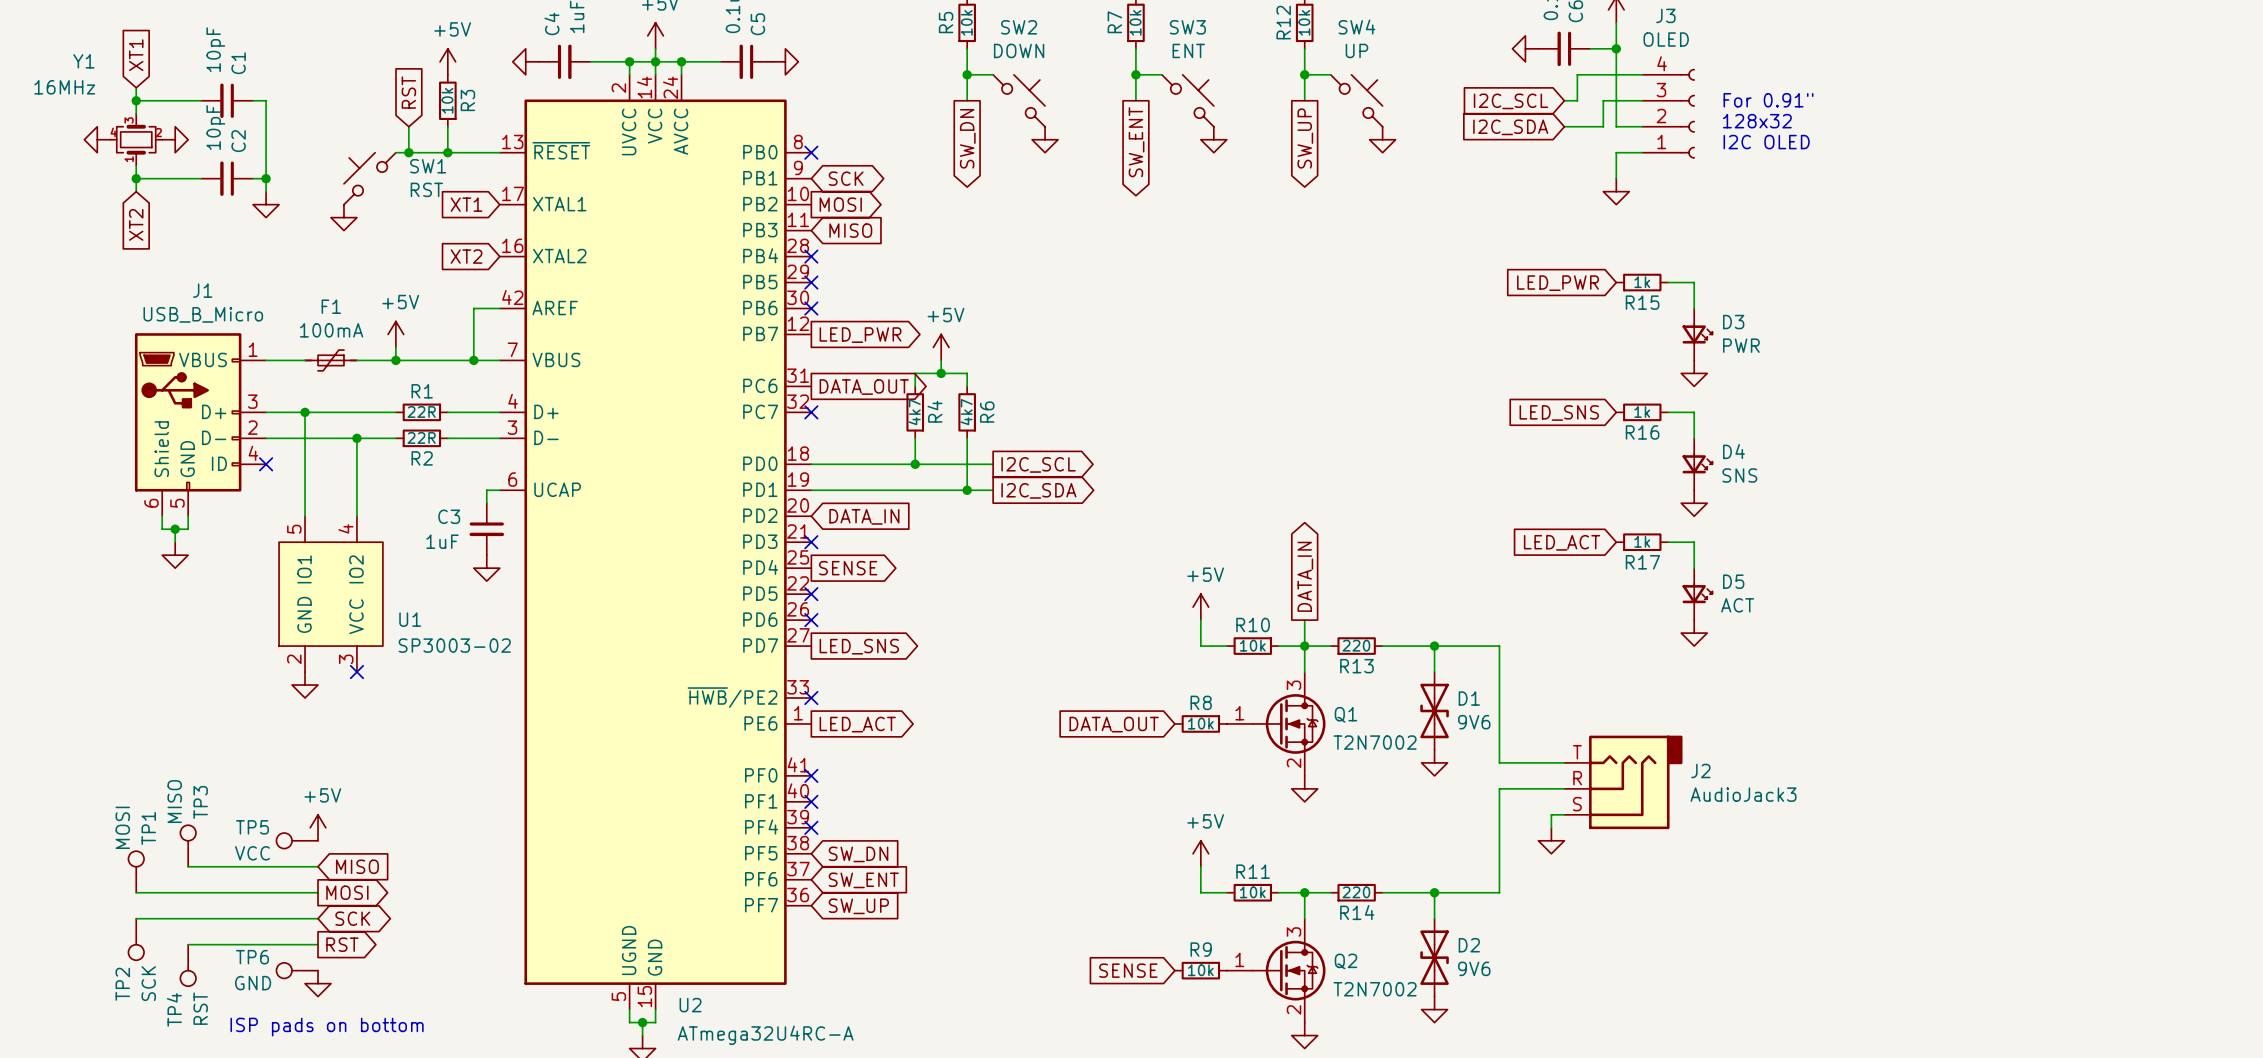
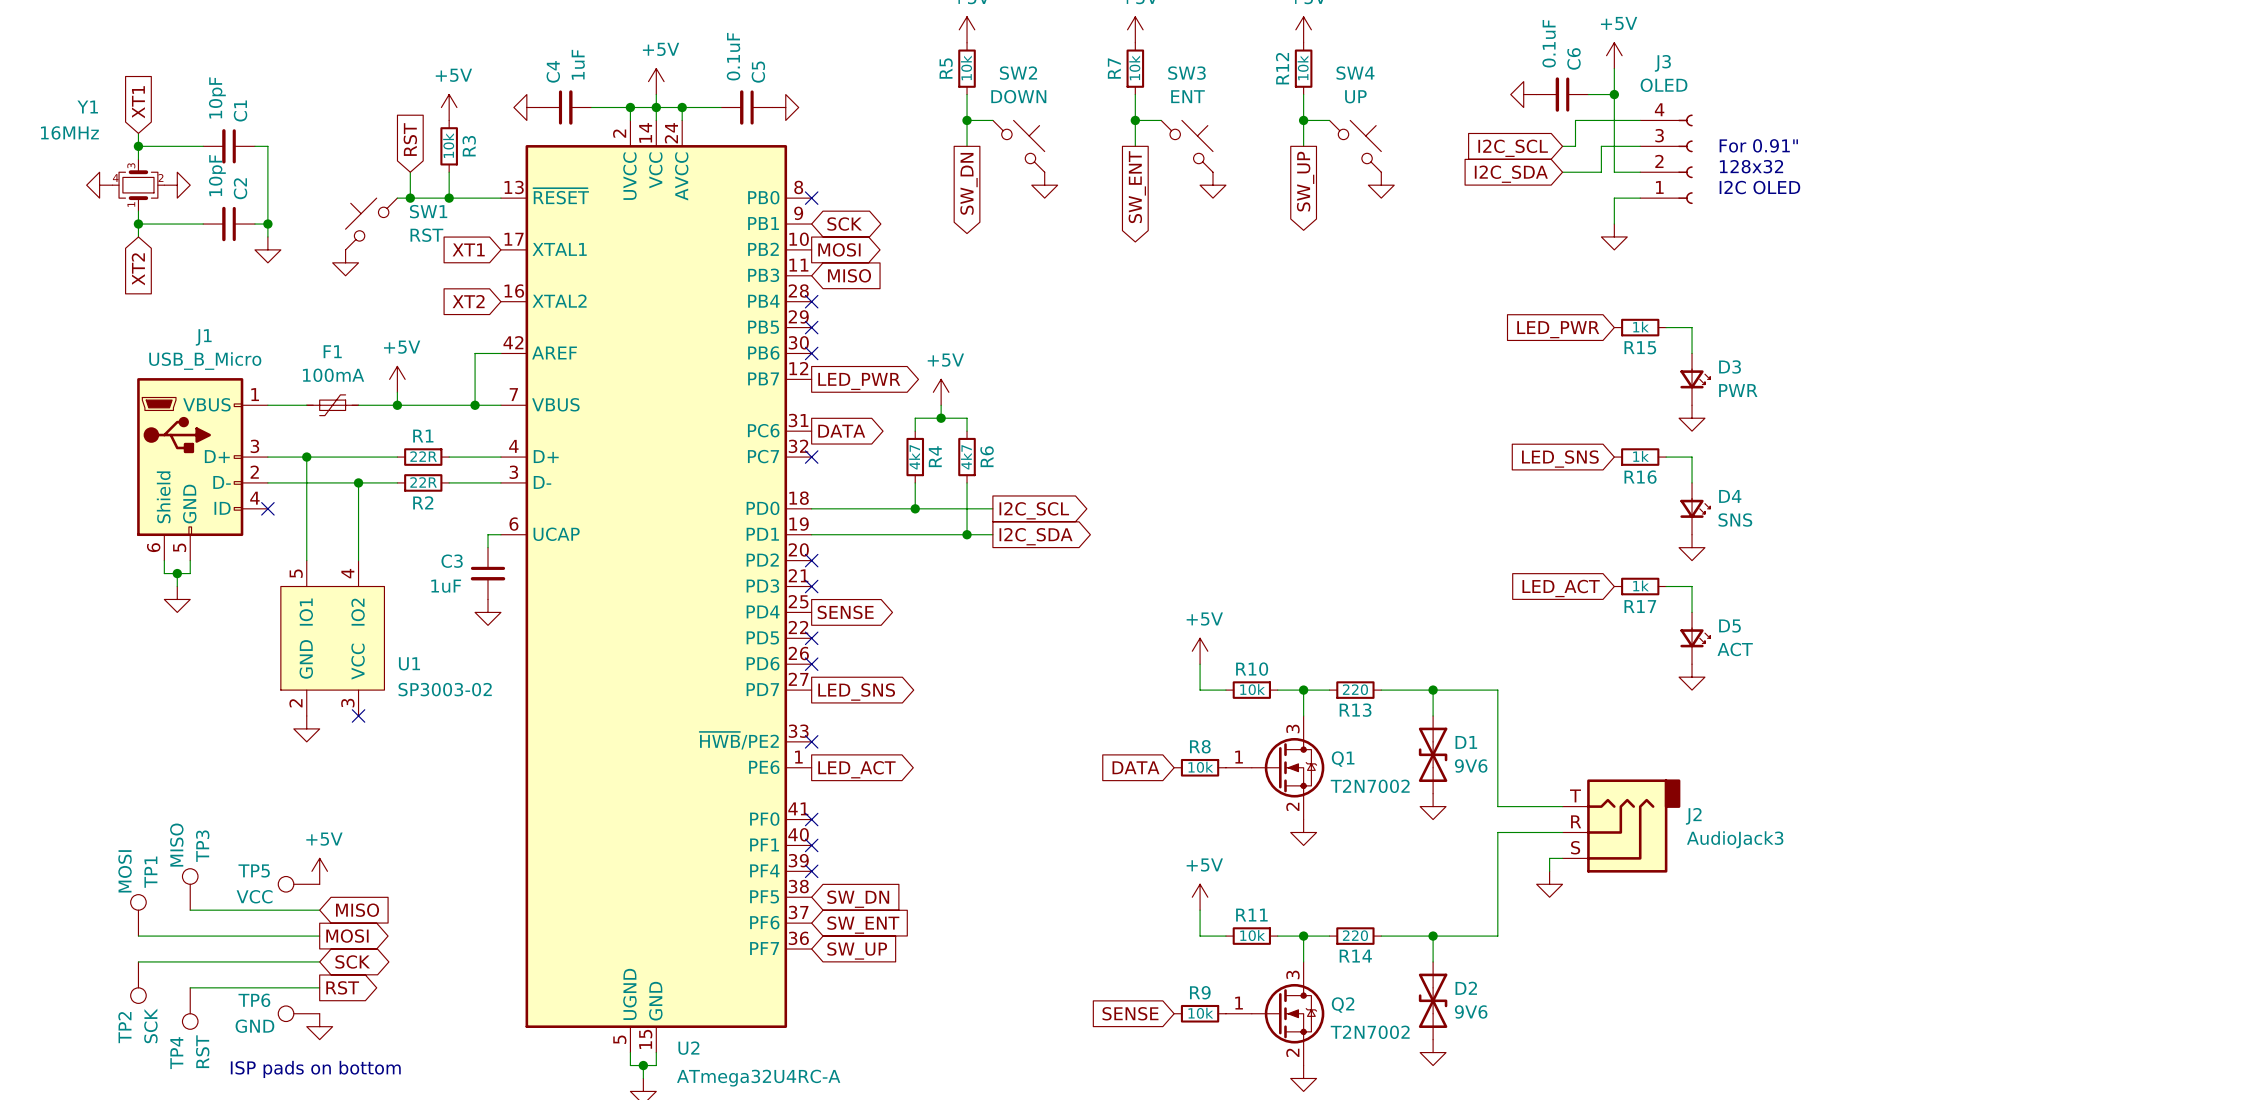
global label: DATA_OUT (864, 387) -> DATA (841, 431)
no-connect mark: none -> (811, 560)
global label: DATA_IN (864, 516) -> none
global label: DATA_IN (1305, 576) -> none
wire: (1304, 620) (1304, 646) -> none
global label: DATA_OUT (1114, 724) -> DATA (1135, 767)

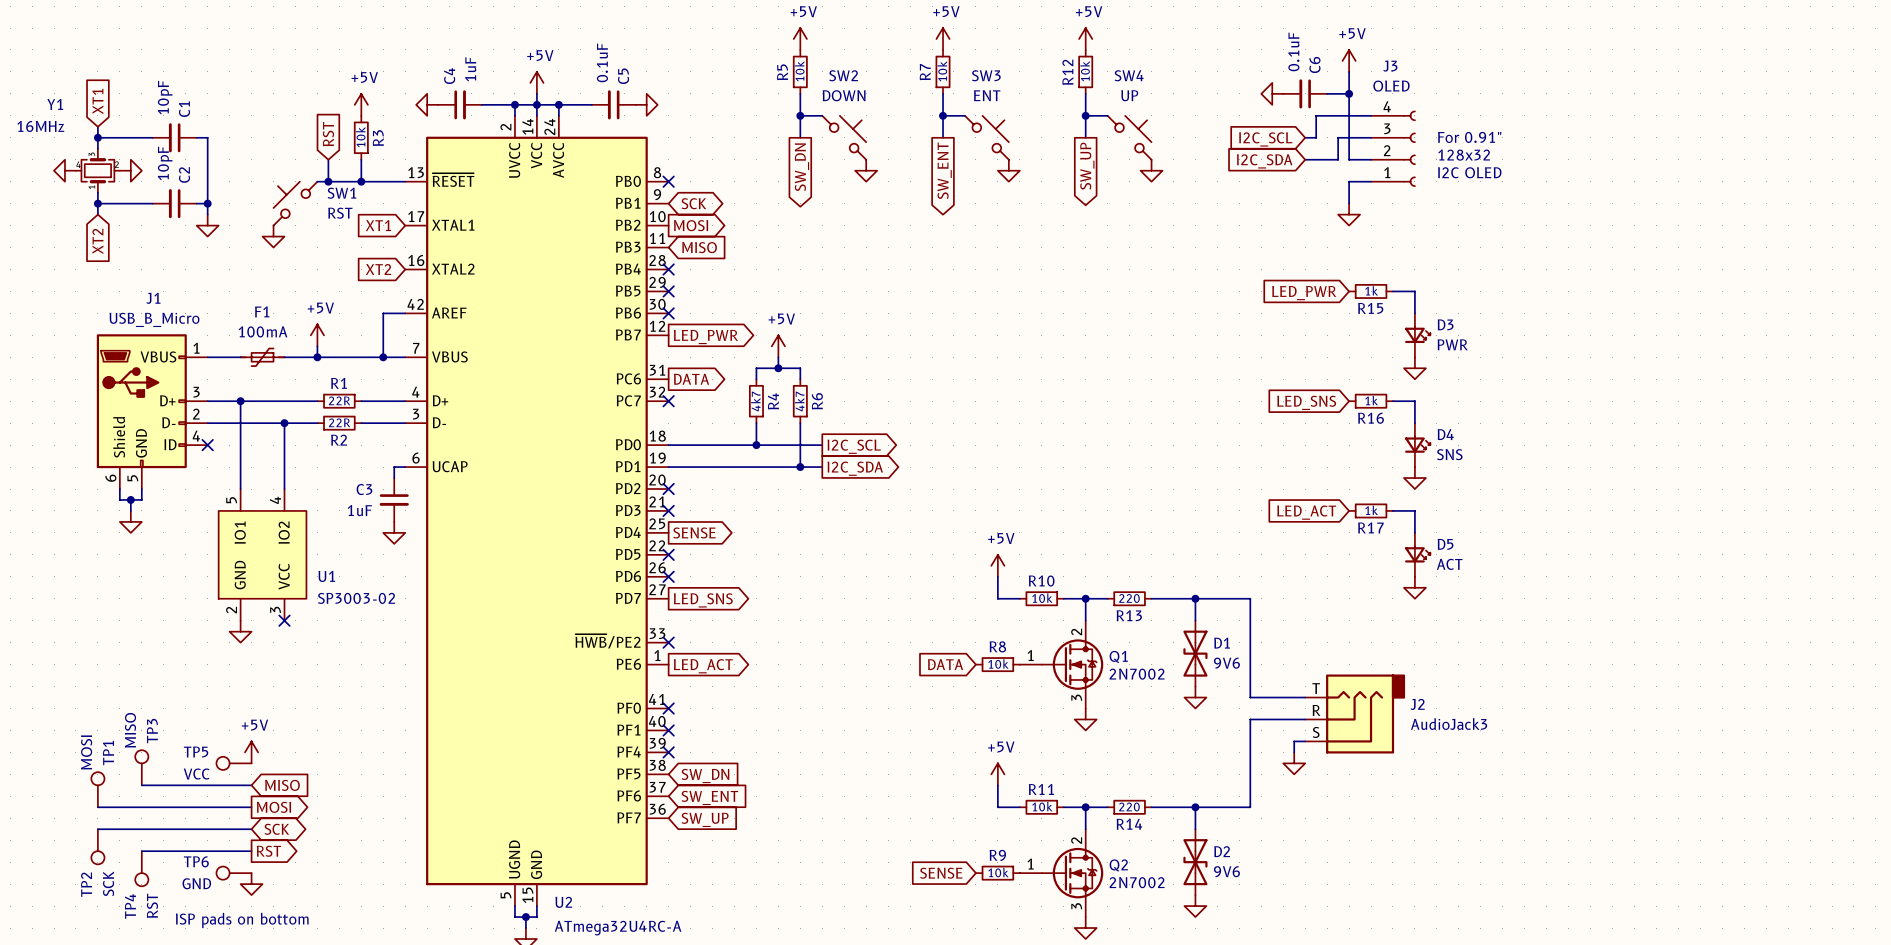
Q1 pin number: 3 (1292, 728) -> 2 (1076, 632)
Q1 value: T2N7002 (1370, 786) -> 2N7002 (1137, 674)
Q1 pin number: 2 (1292, 806) -> 3 (1076, 697)
Q2 pin number: 3 (1292, 974) -> 2 (1076, 840)
Q2 value: T2N7002 (1370, 1032) -> 2N7002 (1137, 882)
Q2 pin number: 2 (1292, 1052) -> 3 (1076, 906)

